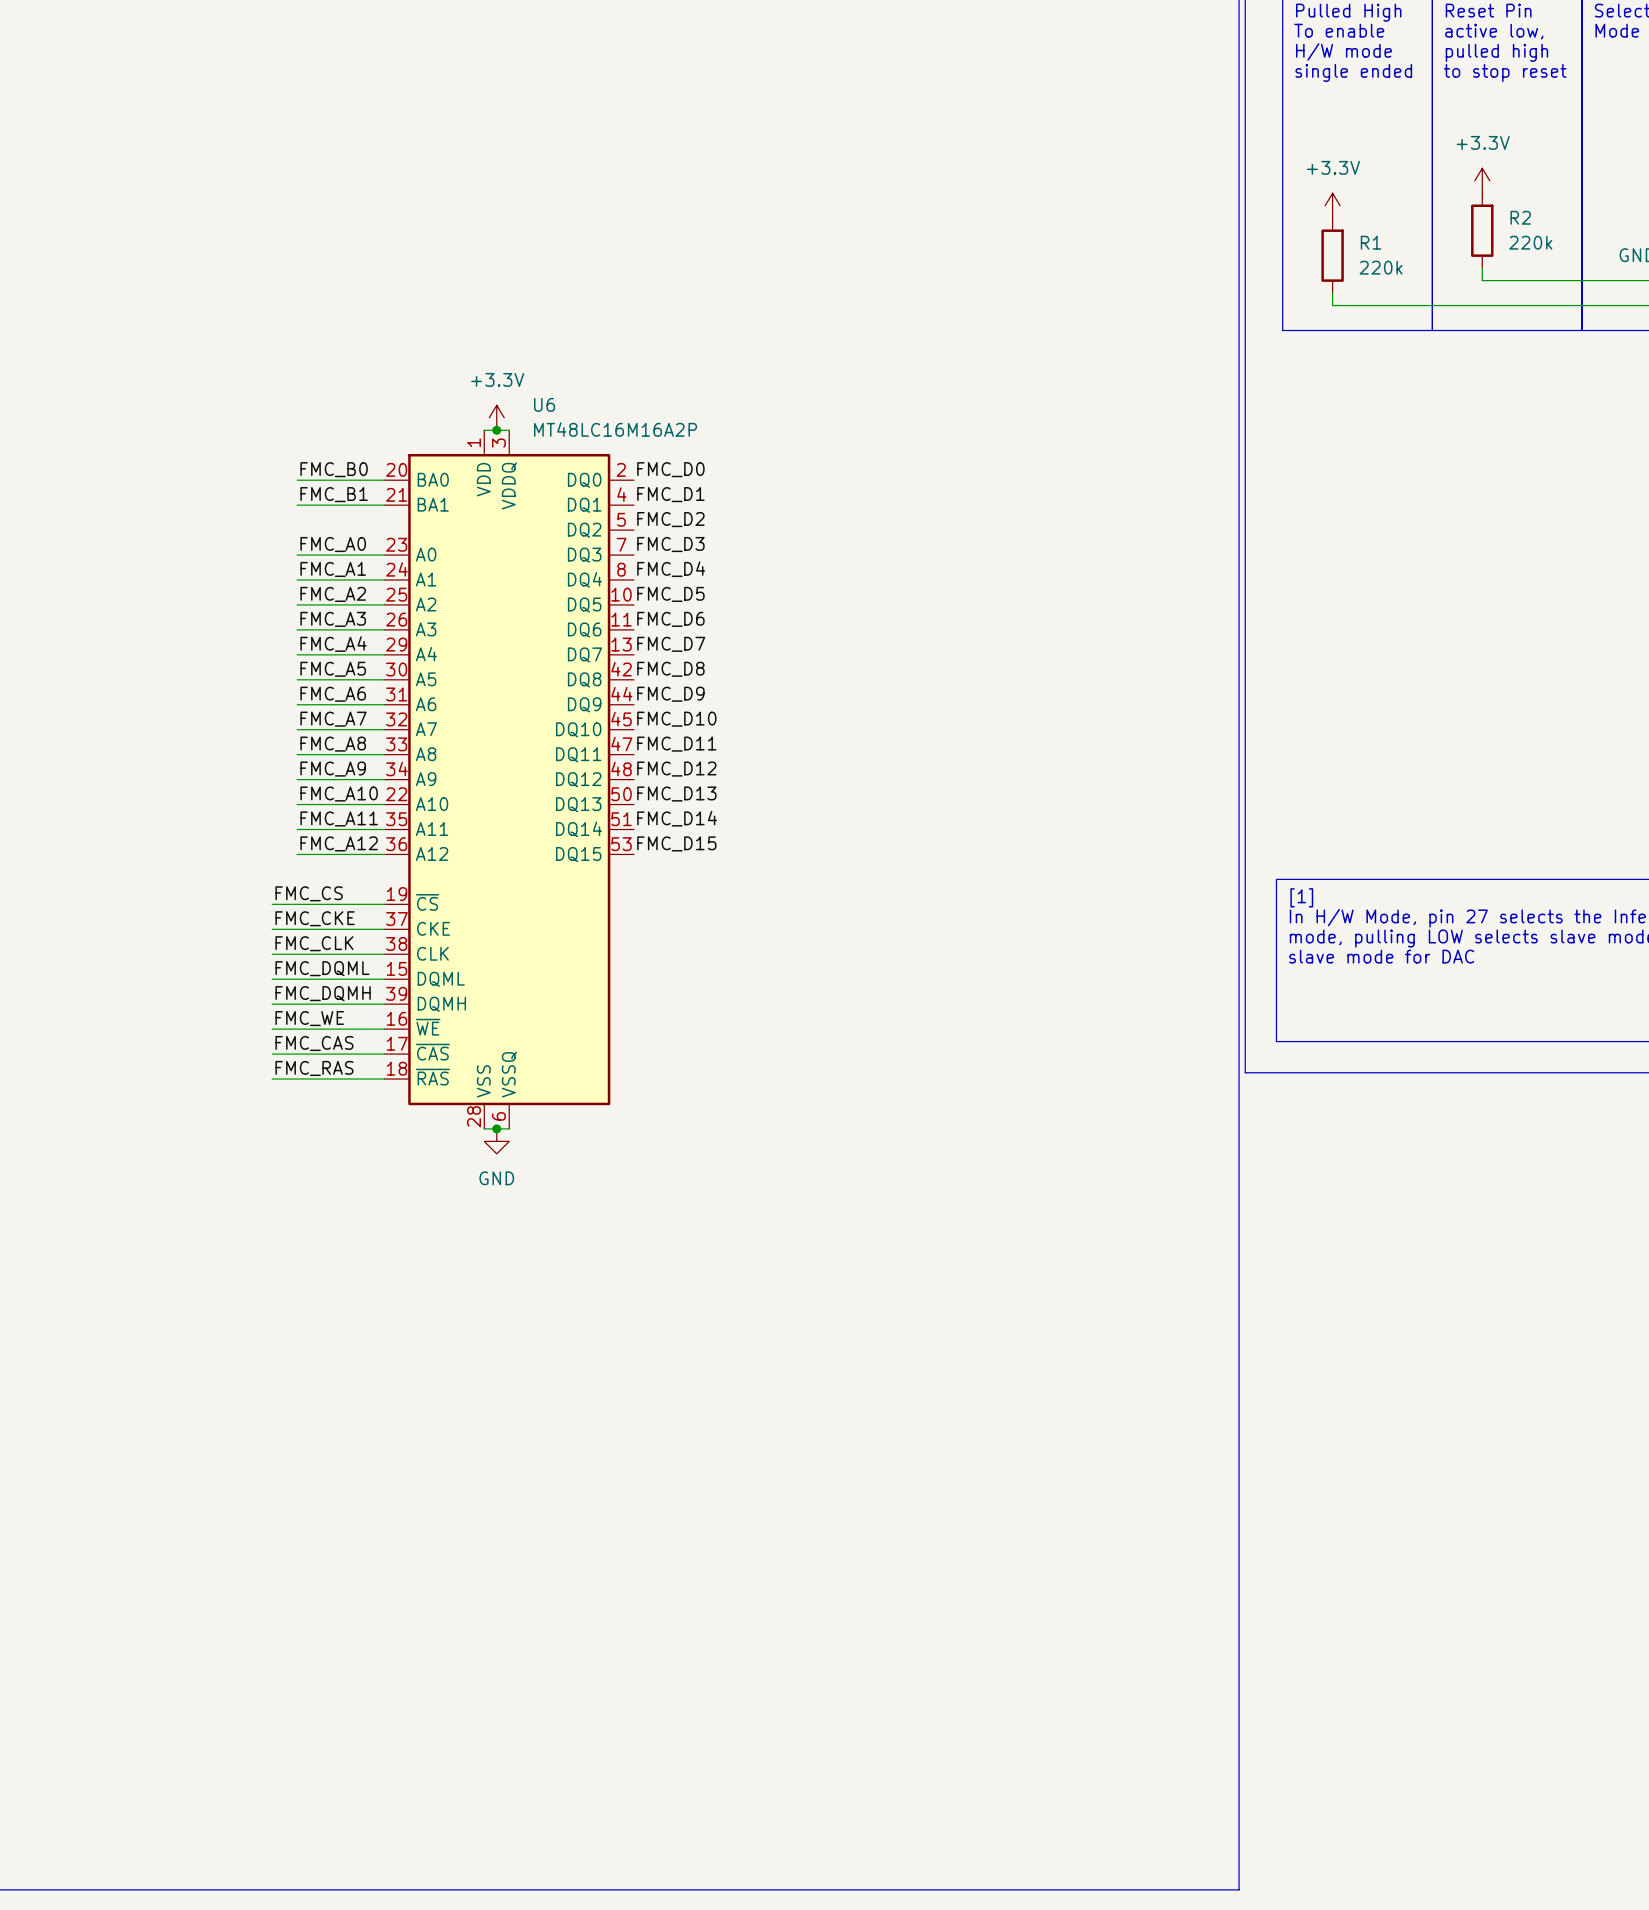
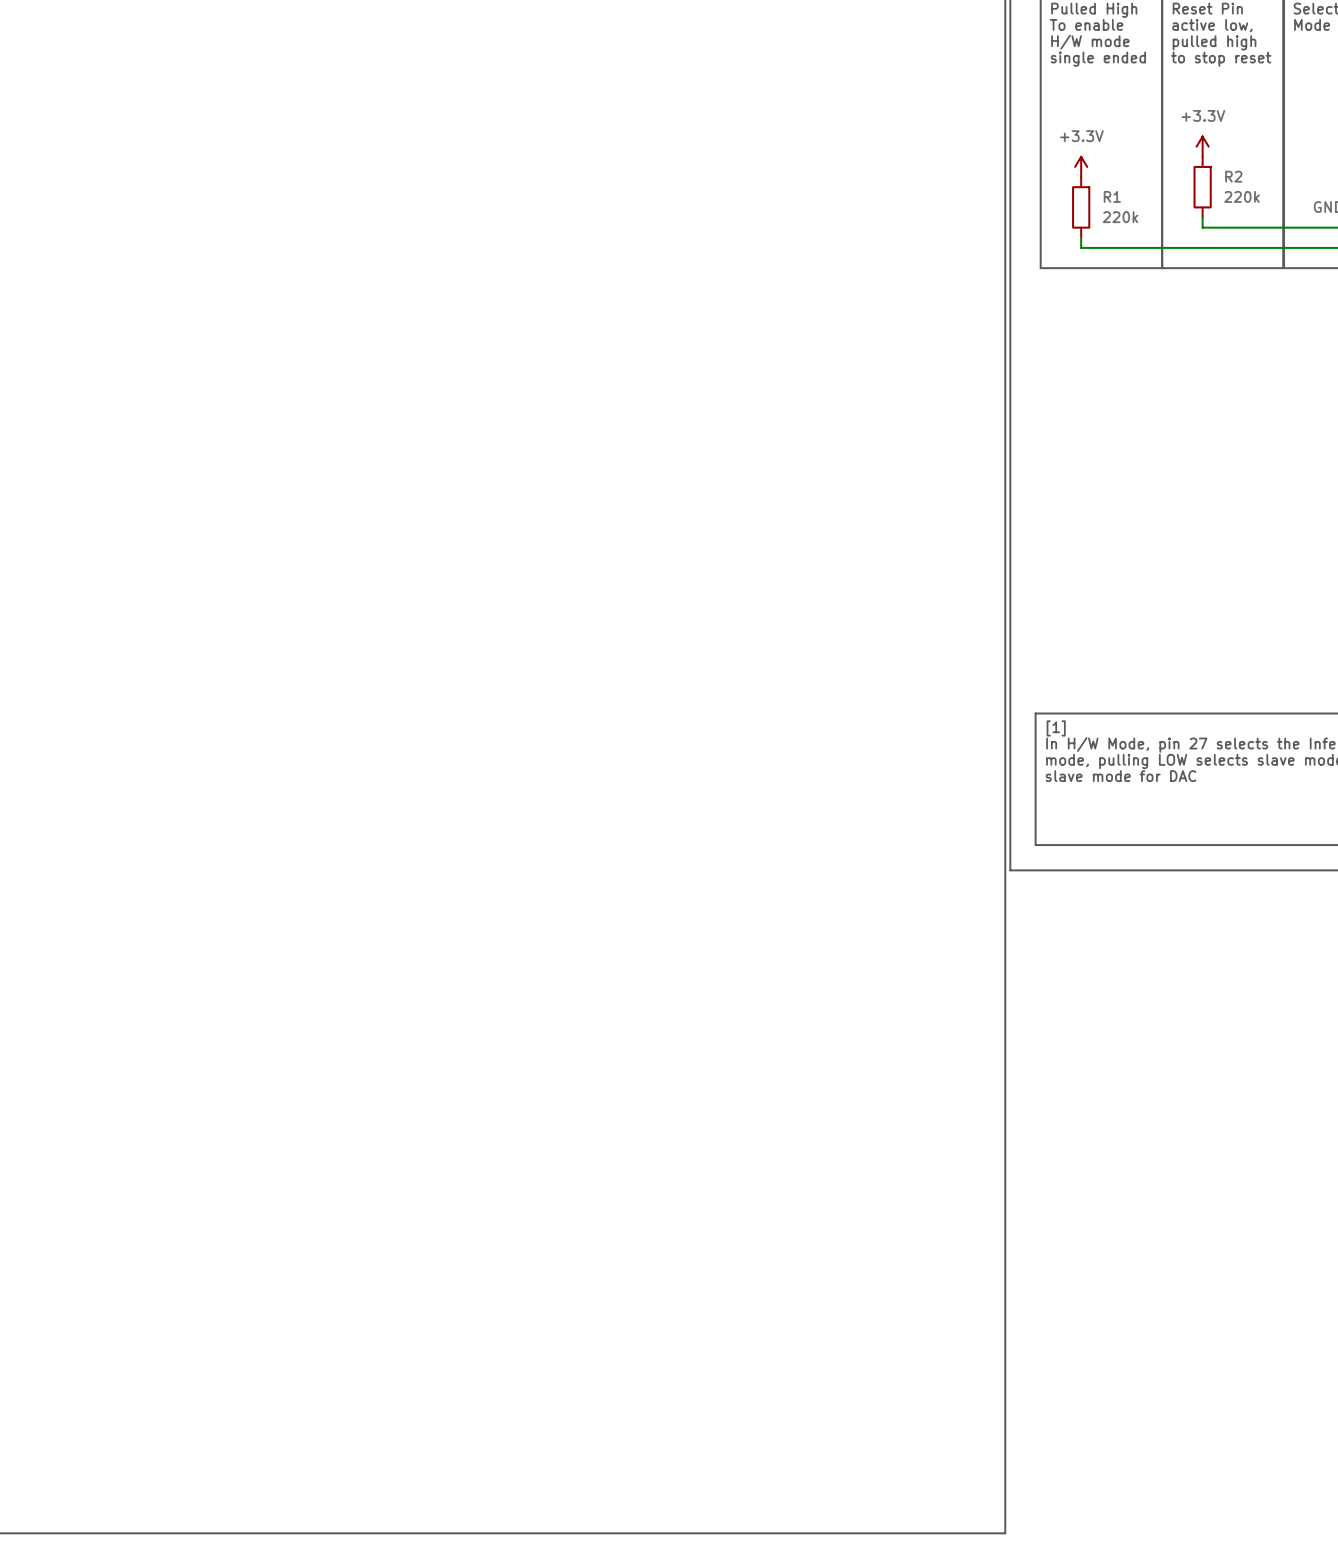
power symbol: +3.3V (496, 417) -> none
wire: (484, 430) (509, 430) -> none
junction: (496, 430) -> none
label: FMC_B0 (334, 469) -> none
label: FMC_D0 (670, 469) -> none
wire: (297, 480) (384, 480) -> none
label: FMC_B1 (334, 494) -> none
label: FMC_D1 (670, 494) -> none
wire: (297, 505) (384, 505) -> none
label: FMC_D2 (670, 519) -> none
label: FMC_A0 (333, 544) -> none
label: FMC_D3 (670, 544) -> none
wire: (297, 555) (384, 555) -> none
label: FMC_A1 (333, 569) -> none
label: FMC_D4 (671, 569) -> none
wire: (297, 580) (384, 580) -> none
label: FMC_A2 (333, 594) -> none
label: FMC_D5 (670, 594) -> none
wire: (297, 604) (384, 604) -> none
label: FMC_A3 (333, 619) -> none
label: FMC_D6 (670, 619) -> none
wire: (297, 629) (384, 629) -> none
label: FMC_A4 (333, 644) -> none
label: FMC_D7 (671, 644) -> none
wire: (297, 654) (384, 654) -> none
label: FMC_A5 (333, 669) -> none
label: FMC_D8 (670, 669) -> none
wire: (297, 679) (384, 679) -> none
label: FMC_A6 (333, 694) -> none
label: FMC_D9 (670, 694) -> none
wire: (297, 704) (384, 704) -> none
label: FMC_A7 (333, 719) -> none
label: FMC_D10 (676, 719) -> none
wire: (297, 729) (384, 729) -> none
label: FMC_A8 (333, 744) -> none
label: FMC_D11 (676, 744) -> none
wire: (297, 754) (384, 754) -> none
label: FMC_A9 (333, 769) -> none
label: FMC_D12 (676, 769) -> none
wire: (297, 779) (384, 779) -> none
U6: MT48LC16M16A2P (509, 779) -> none
label: FMC_A10 (339, 794) -> none
label: FMC_D13 (676, 794) -> none
wire: (297, 804) (384, 804) -> none
label: FMC_A11 (339, 818) -> none
label: FMC_D14 (677, 818) -> none
wire: (297, 829) (384, 829) -> none
label: FMC_A12 (339, 843) -> none
label: FMC_D15 (676, 843) -> none
wire: (297, 854) (384, 854) -> none
label: FMC_CS (309, 893) -> none
wire: (272, 904) (384, 904) -> none
label: FMC_CKE (315, 918) -> none
wire: (272, 929) (384, 929) -> none
label: FMC_CLK (314, 943) -> none
wire: (272, 954) (384, 954) -> none
label: FMC_DQML (322, 968) -> none
wire: (272, 979) (384, 979) -> none
label: FMC_DQMH (323, 993) -> none
wire: (272, 1004) (384, 1004) -> none
label: FMC_WE (309, 1018) -> none
wire: (272, 1029) (384, 1029) -> none
label: FMC_CAS (314, 1043) -> none
wire: (272, 1054) (384, 1054) -> none
label: FMC_RAS (314, 1068) -> none
wire: (272, 1079) (384, 1079) -> none
wire: (484, 1128) (509, 1128) -> none
junction: (496, 1128) -> none
power symbol: GND (496, 1141) -> none

